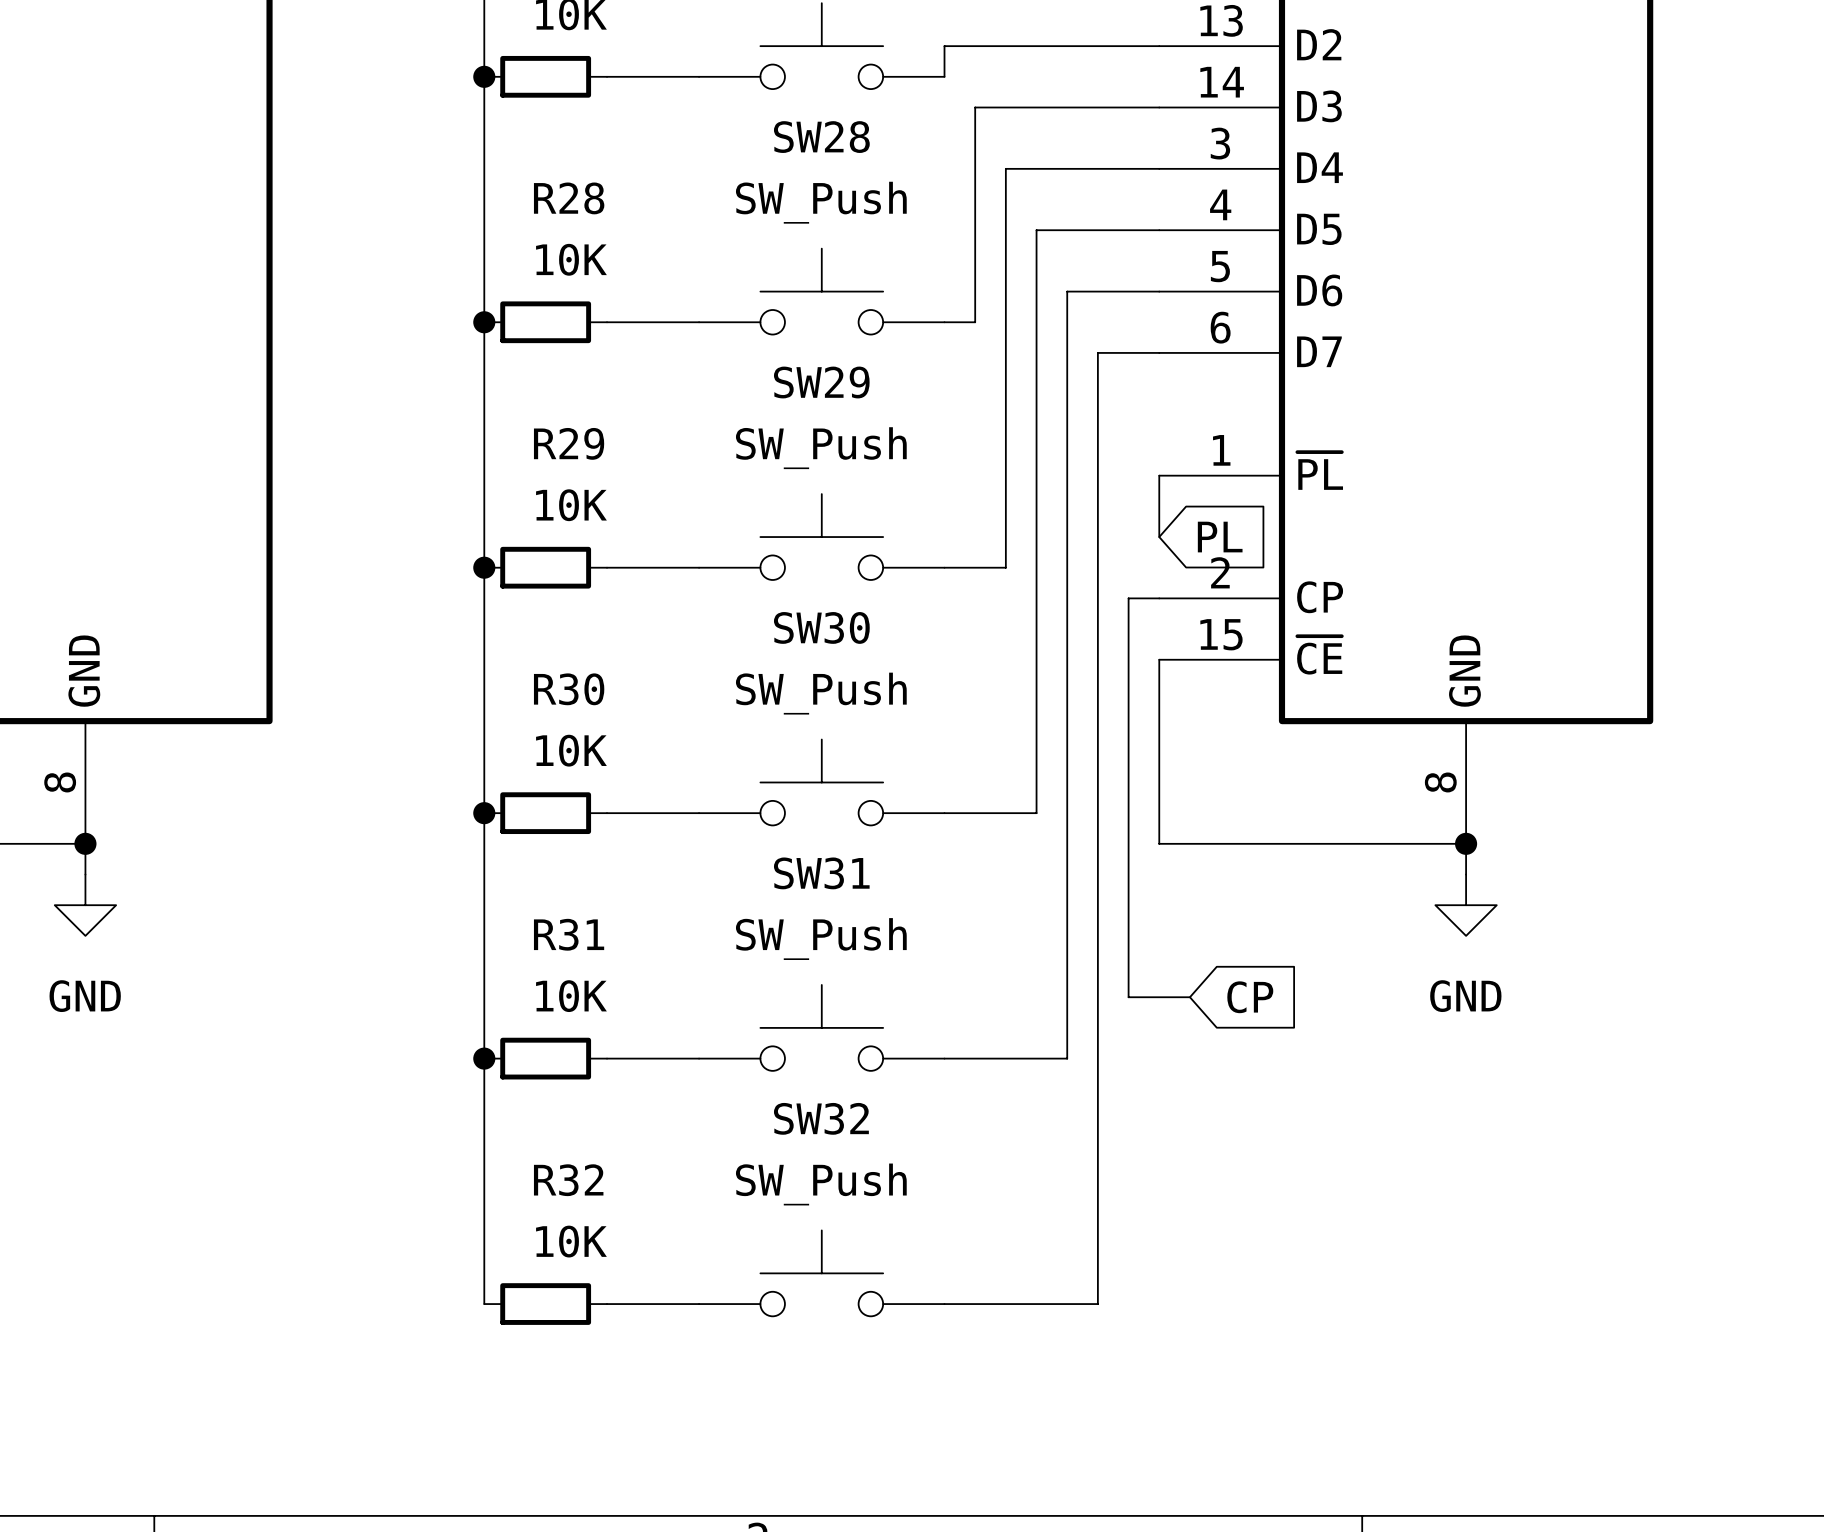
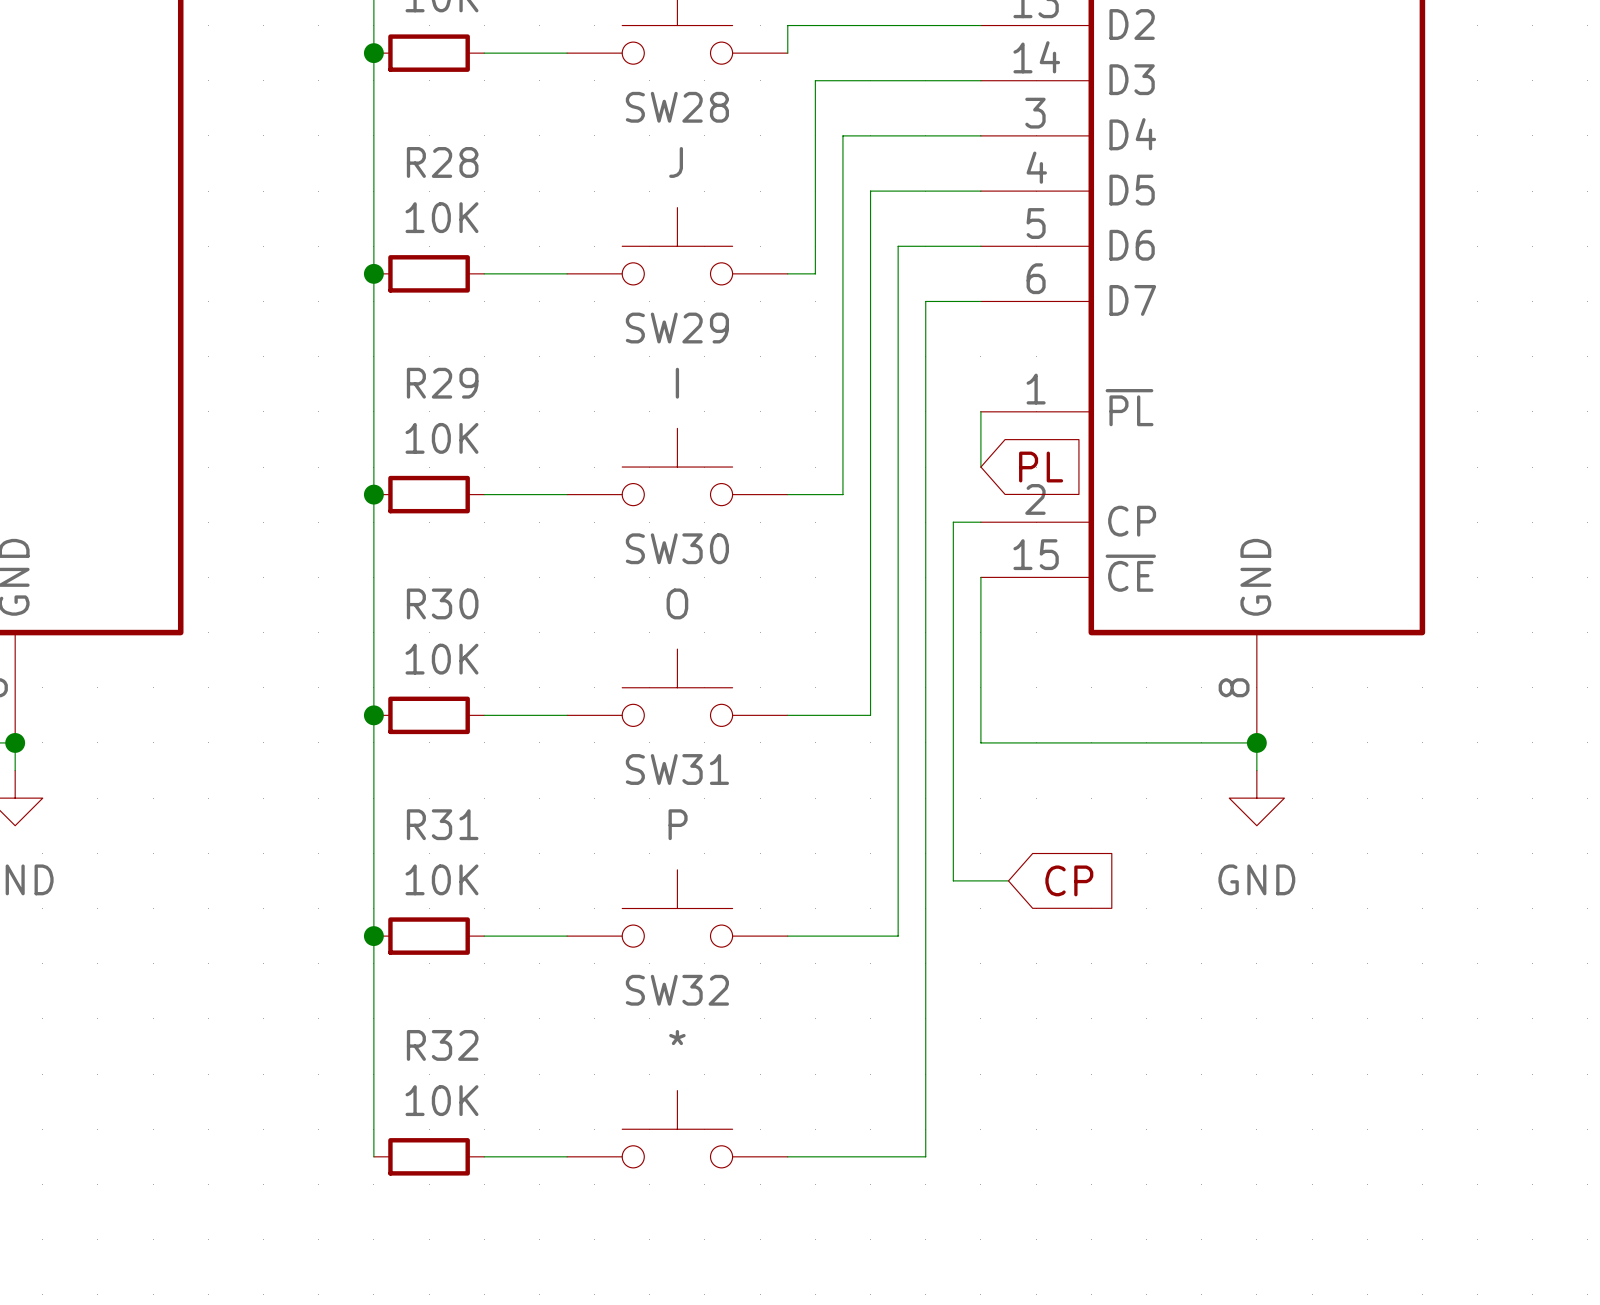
SW28 value: SW_Push (821, 202) -> J (676, 162)
SW29 value: SW_Push (821, 448) -> I (677, 383)
SW30 value: SW_Push (821, 693) -> O (677, 603)
SW31 value: SW_Push (821, 939) -> P (678, 824)
SW32 value: SW_Push (821, 1184) -> * (677, 1037)

